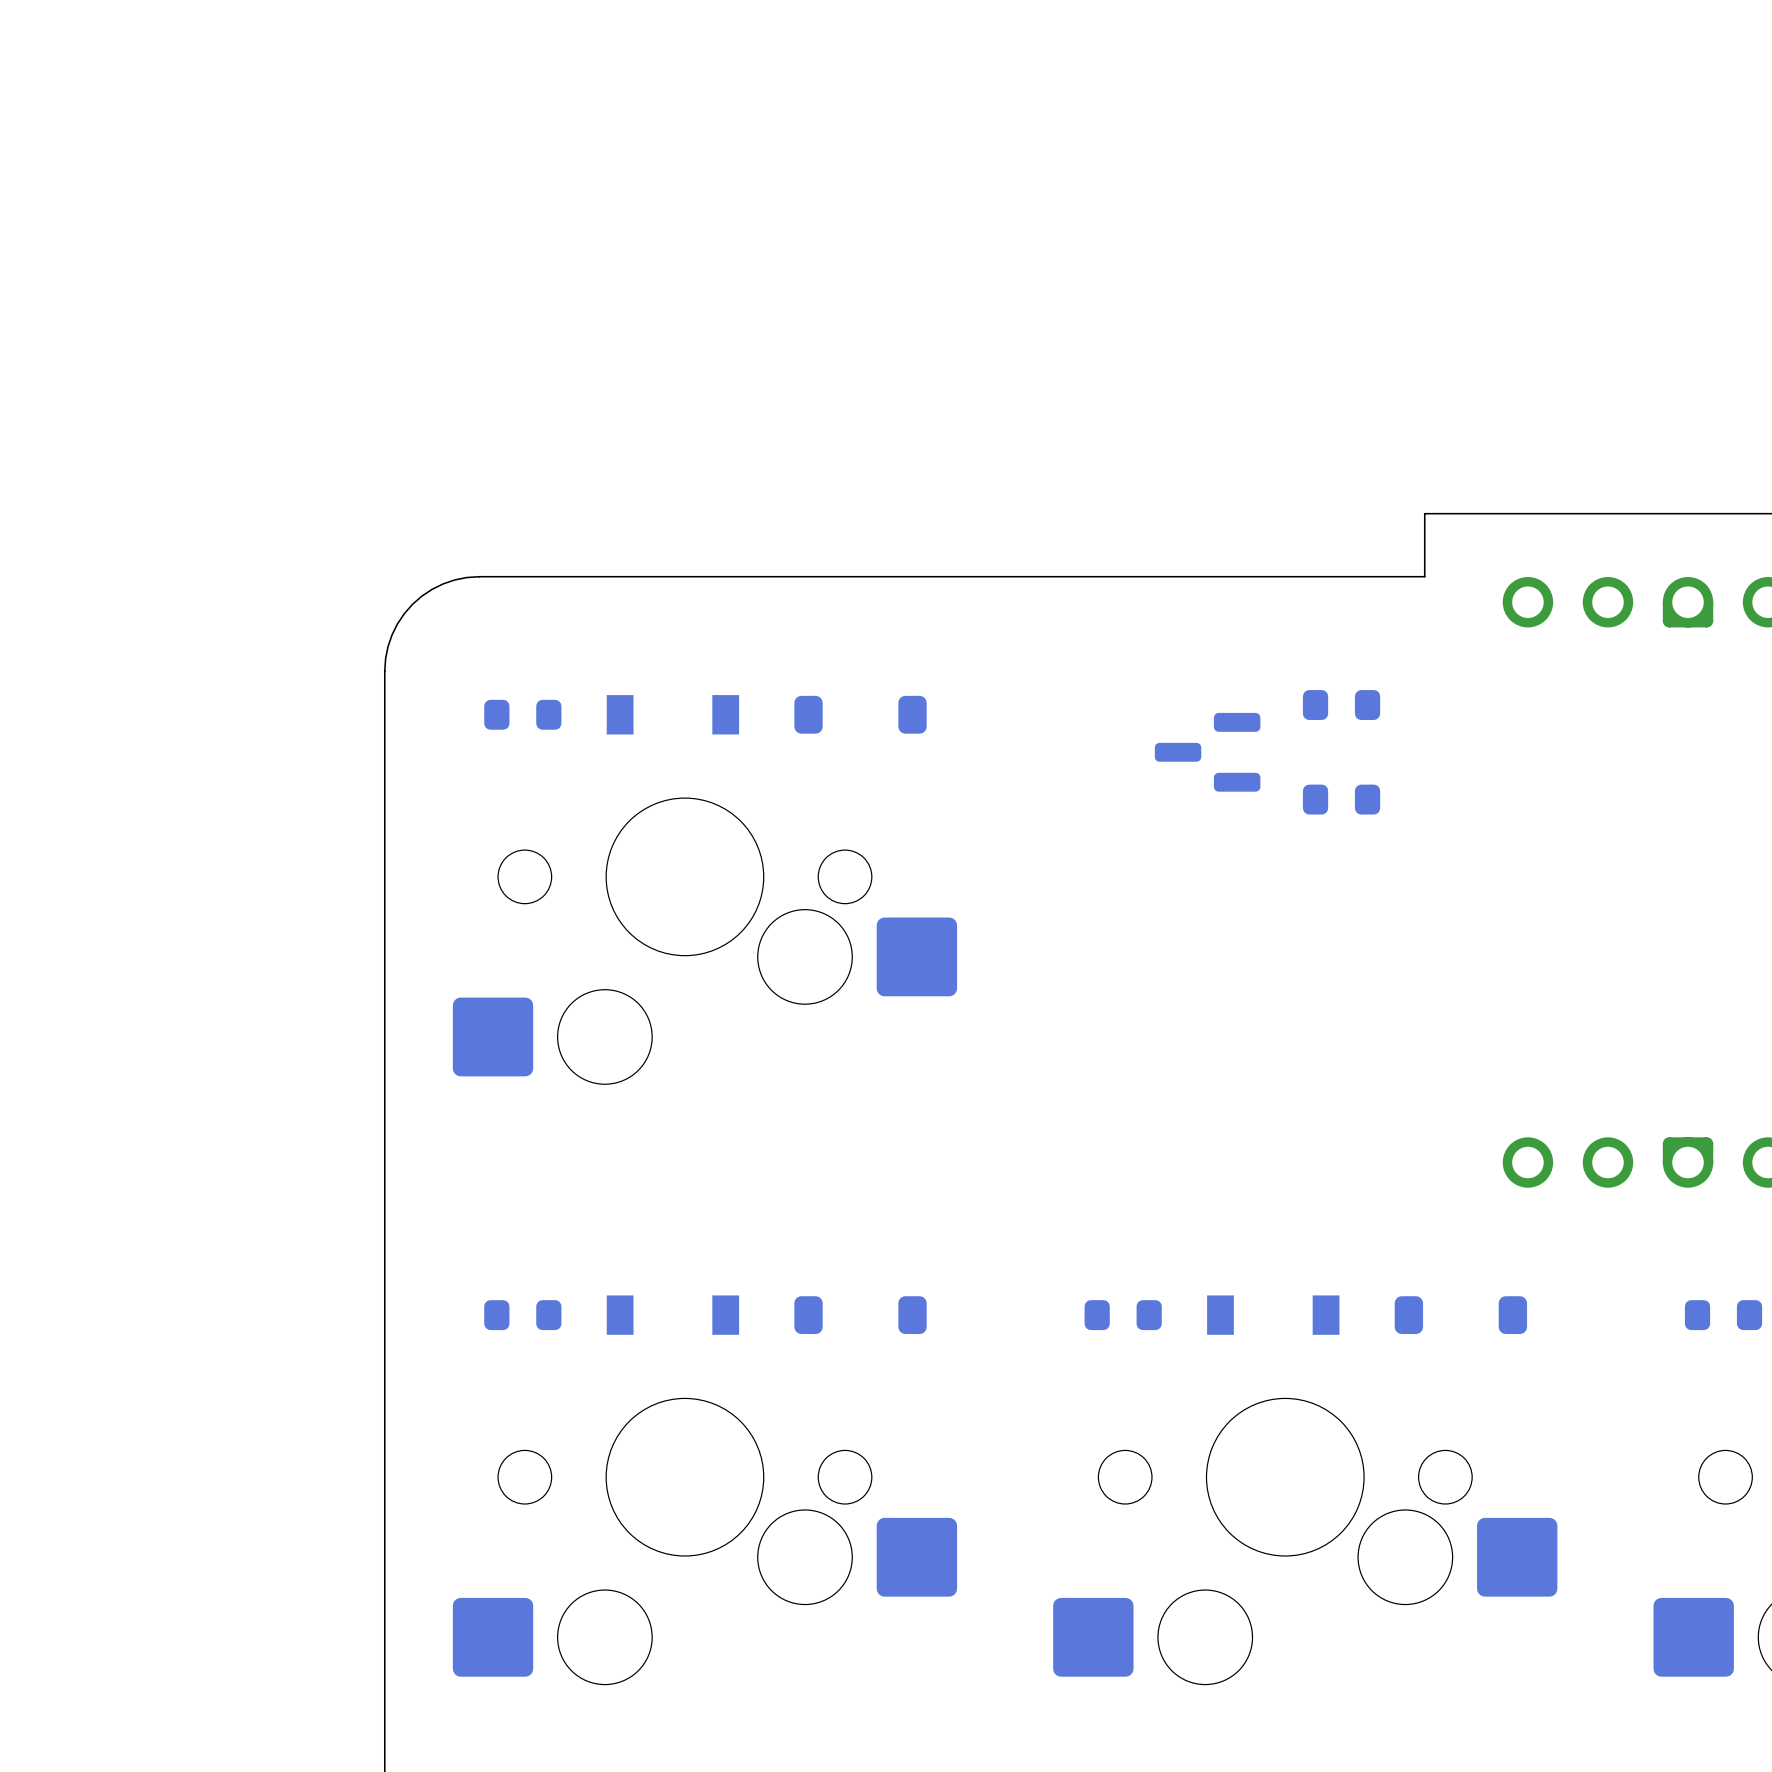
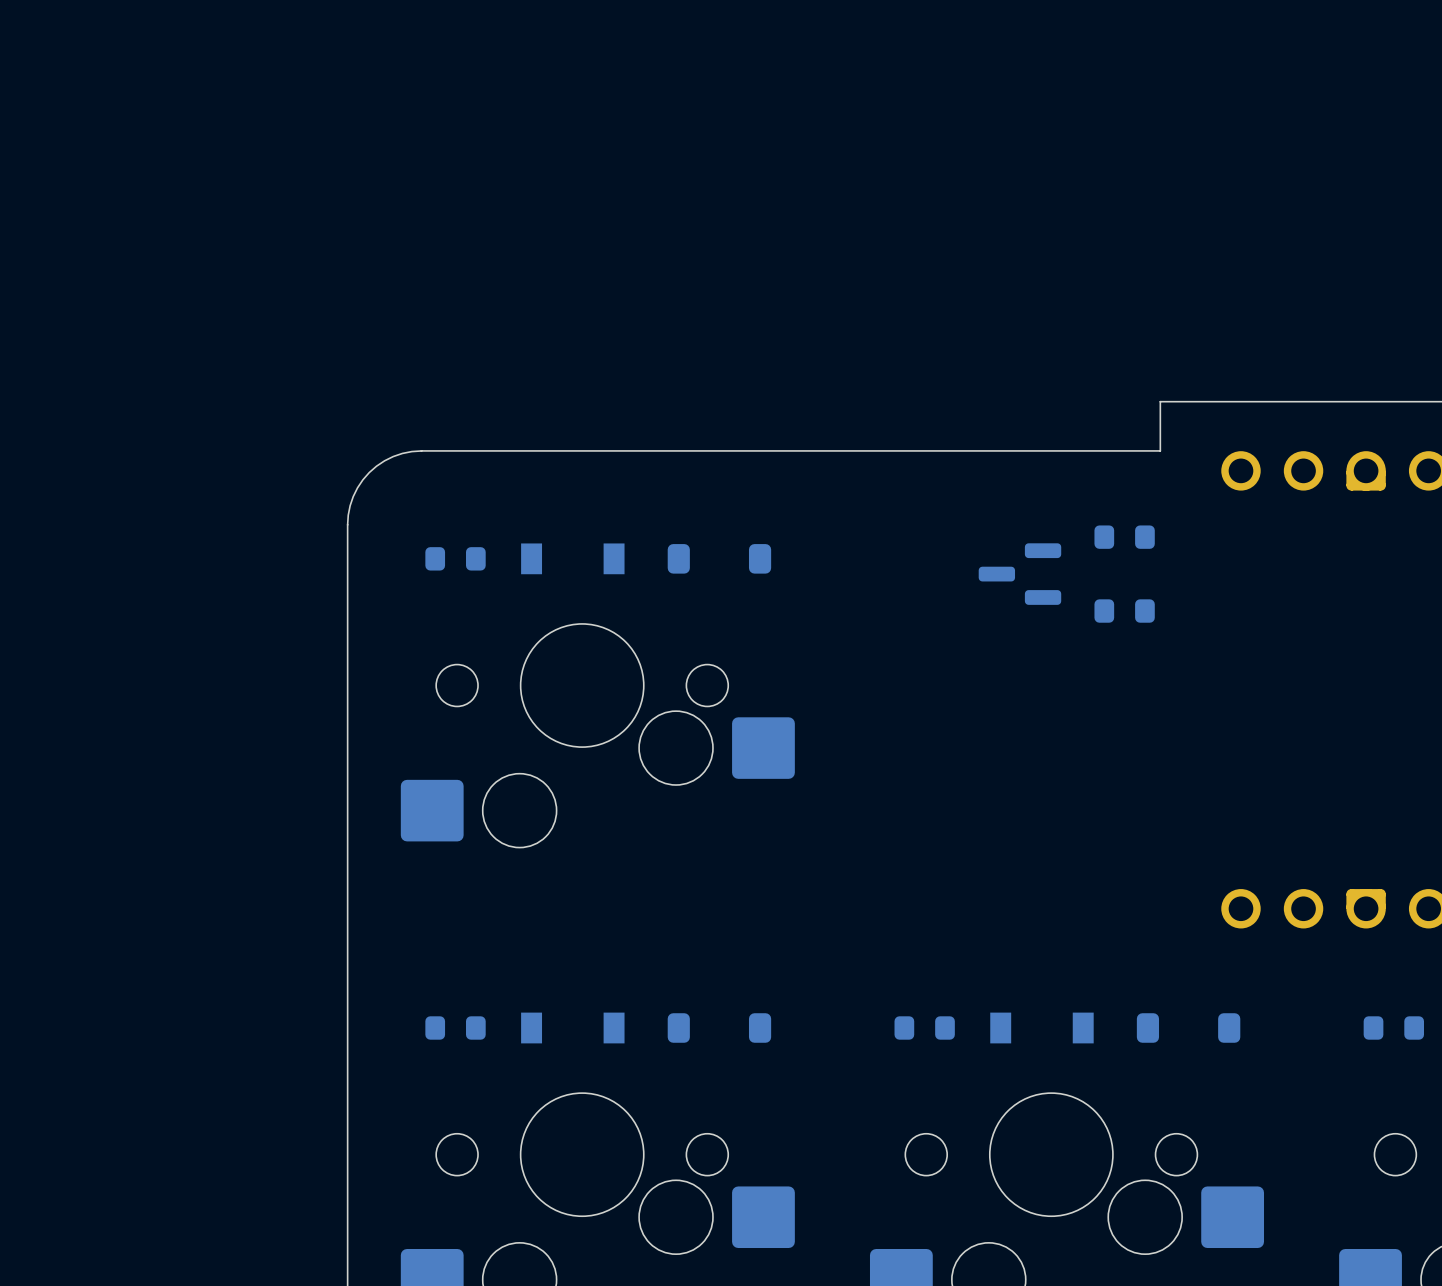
part position: (1341, 705) -> (1124, 537)
part position: (1207, 752) -> (1019, 574)
part position: (1341, 799) -> (1124, 611)

